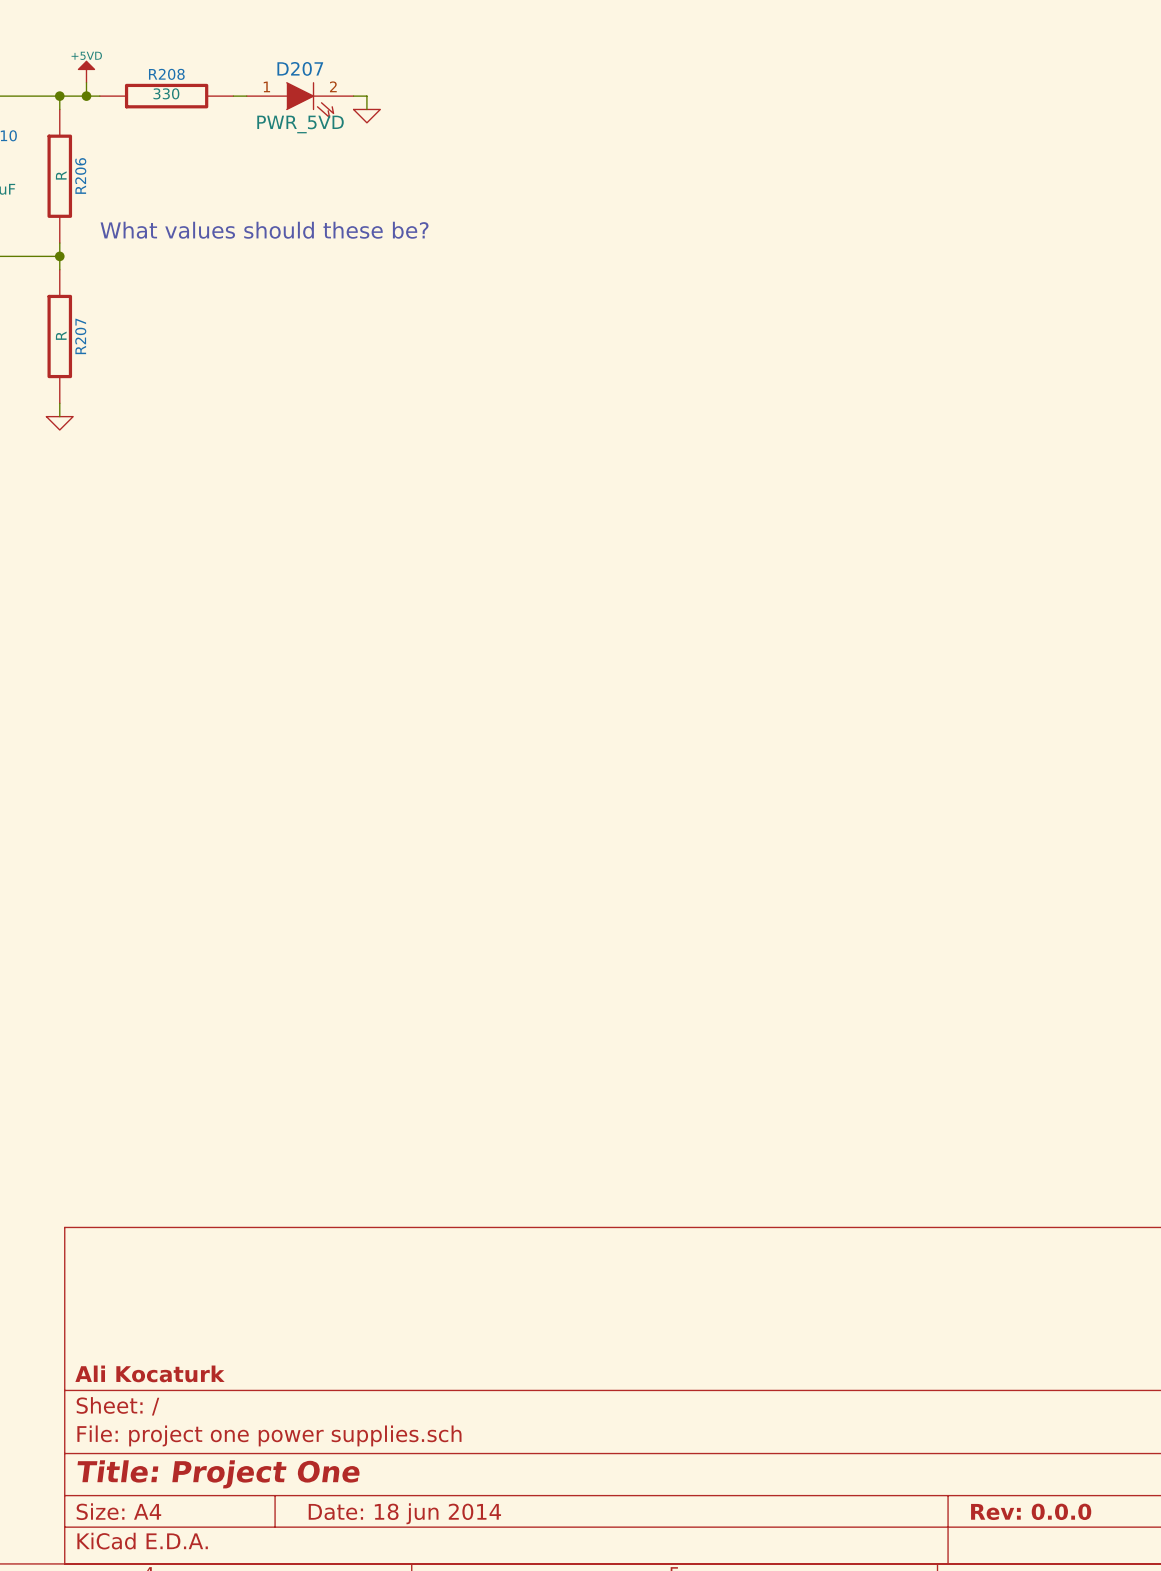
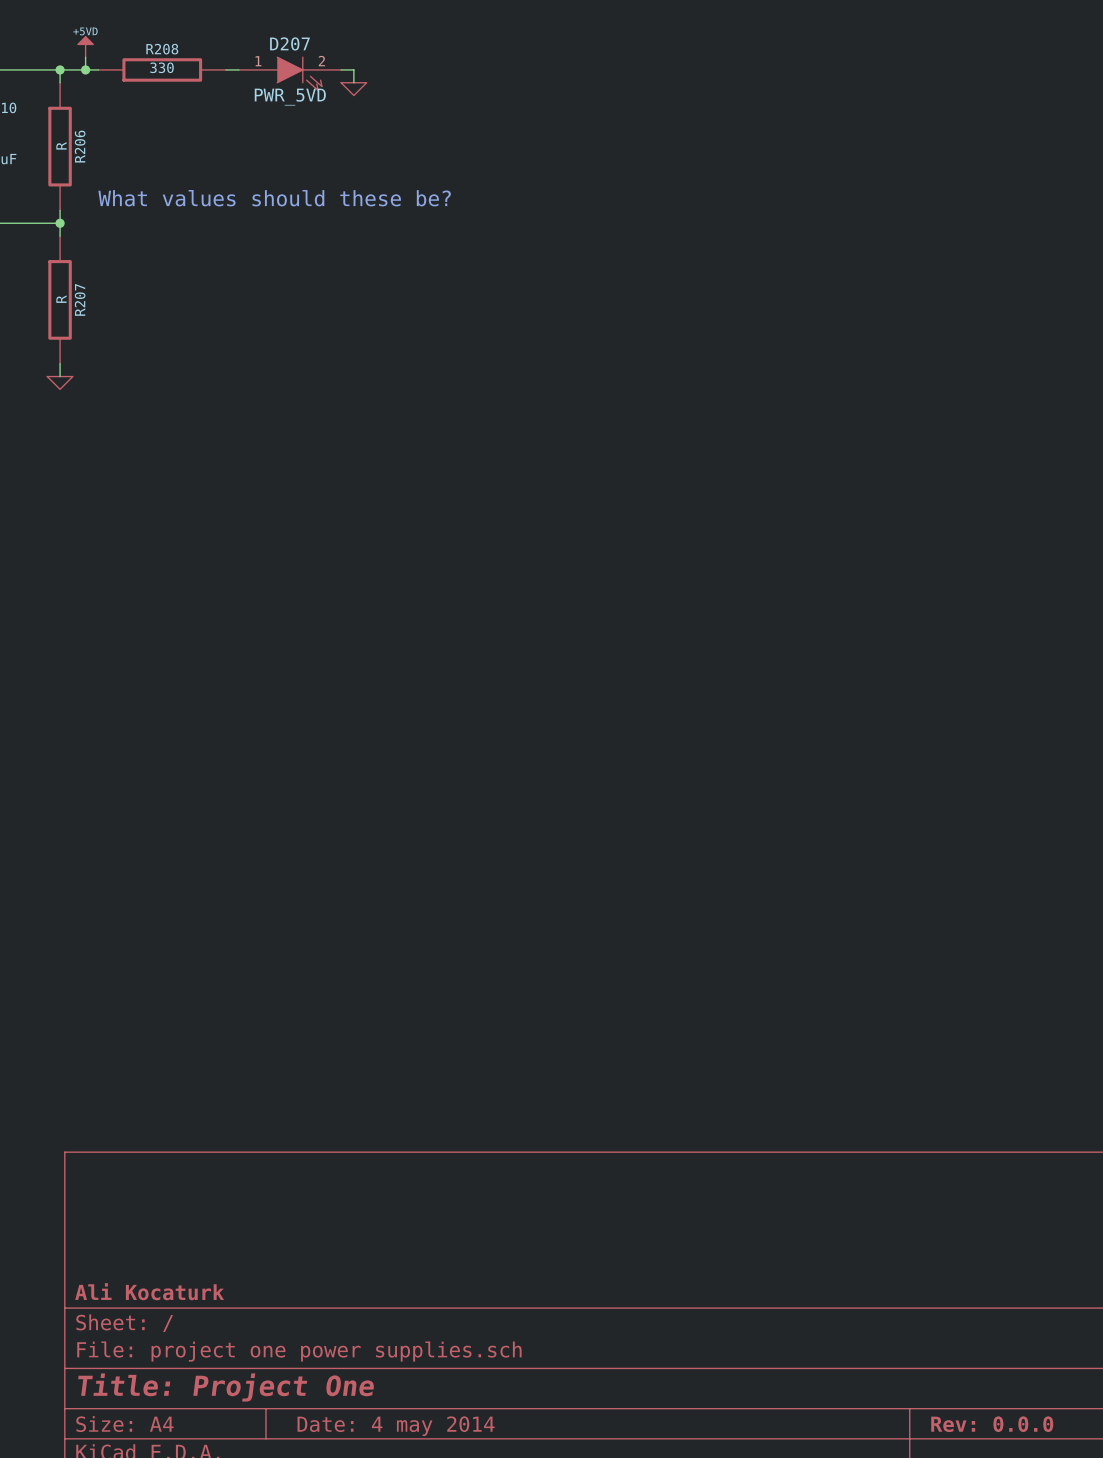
title block: Date: 18 jun 2014 (404, 1513) -> Date: 4 may 2014 (396, 1426)

